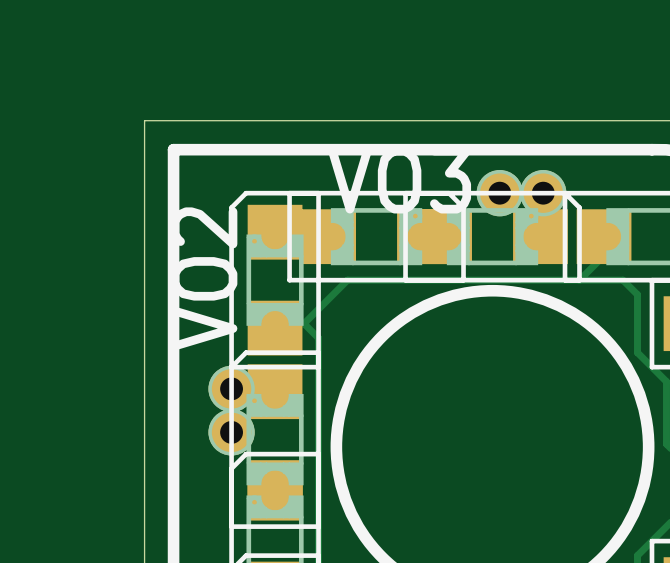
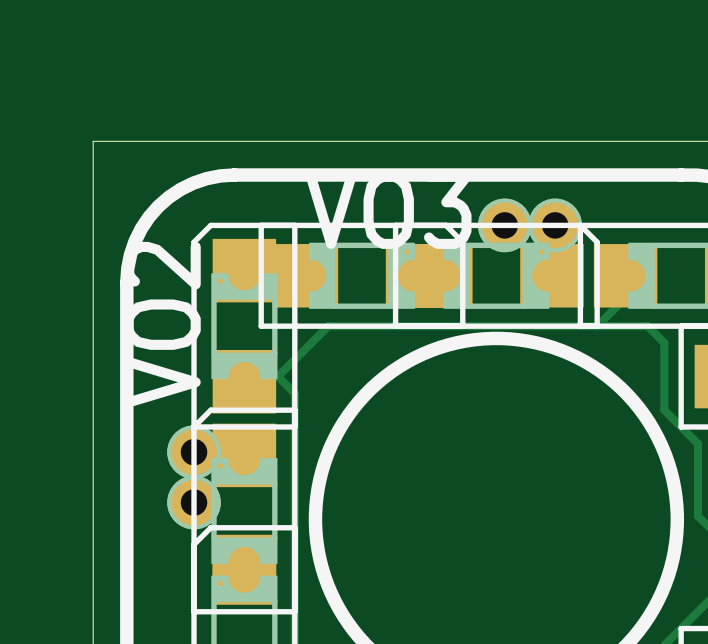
line: (266, 149) (173, 149) (173, 242) -> (234, 175) (220, 175) (193, 183) (180, 189) (158, 206) (141, 228) (135, 241) (127, 268) (126, 282)

